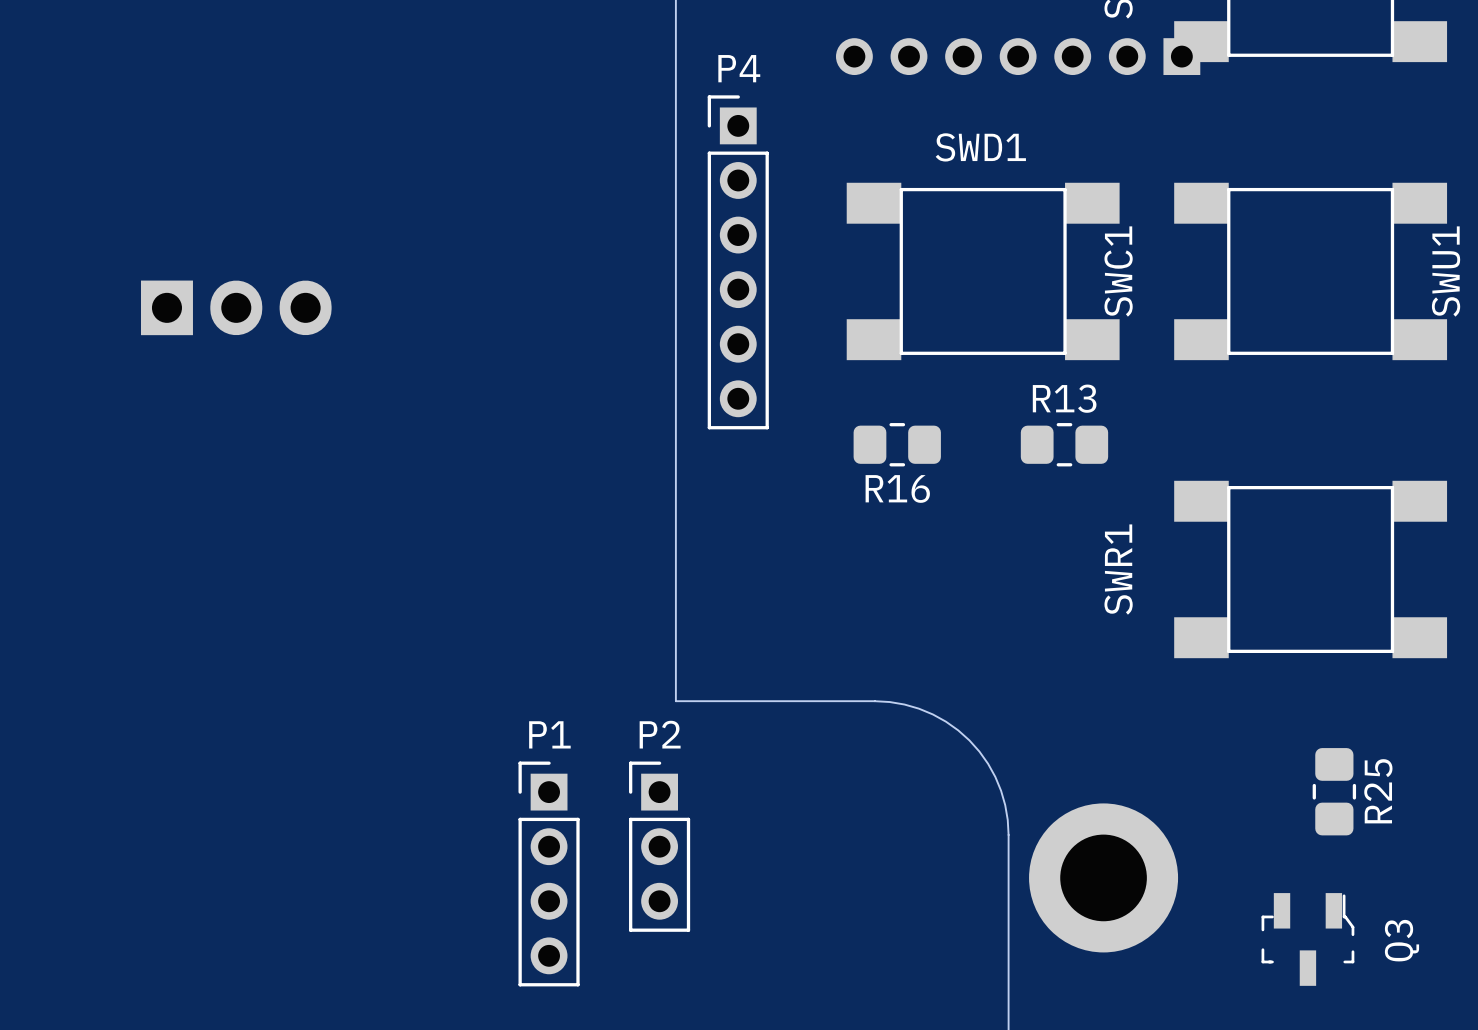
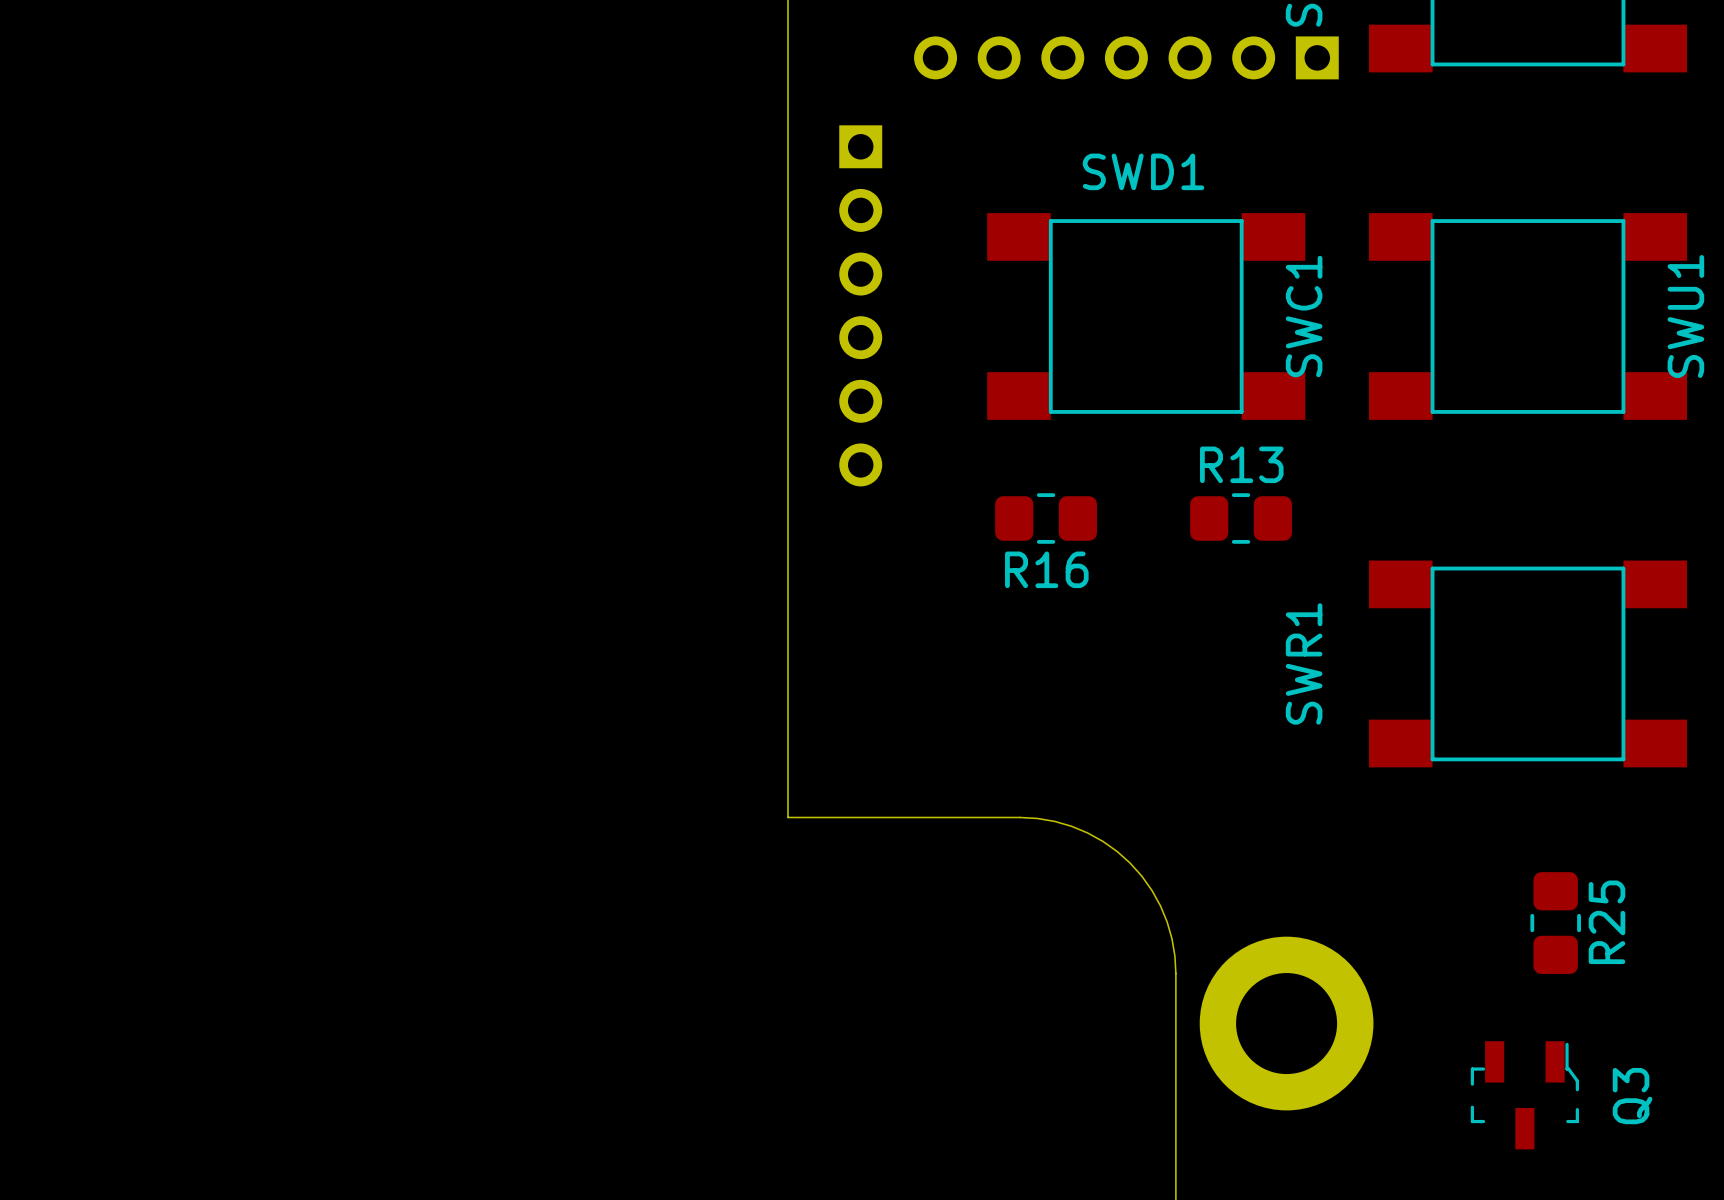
part position: (1018, 56) -> (1126, 57)
P4: (738, 262) -> none
part: (236, 307) -> none
P2: (659, 846) -> none
P1: (549, 873) -> none

